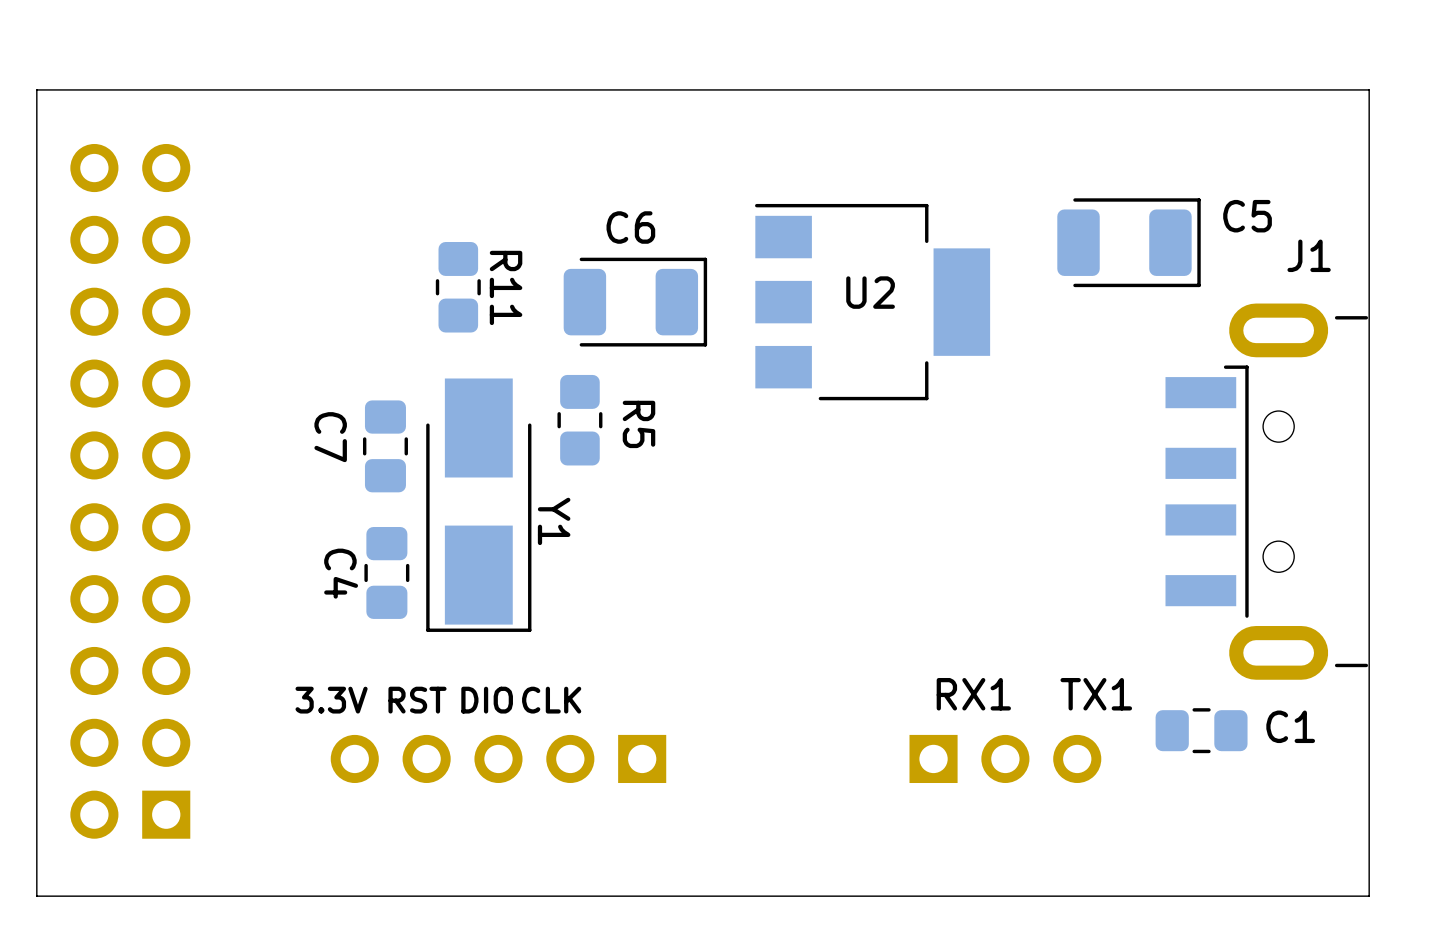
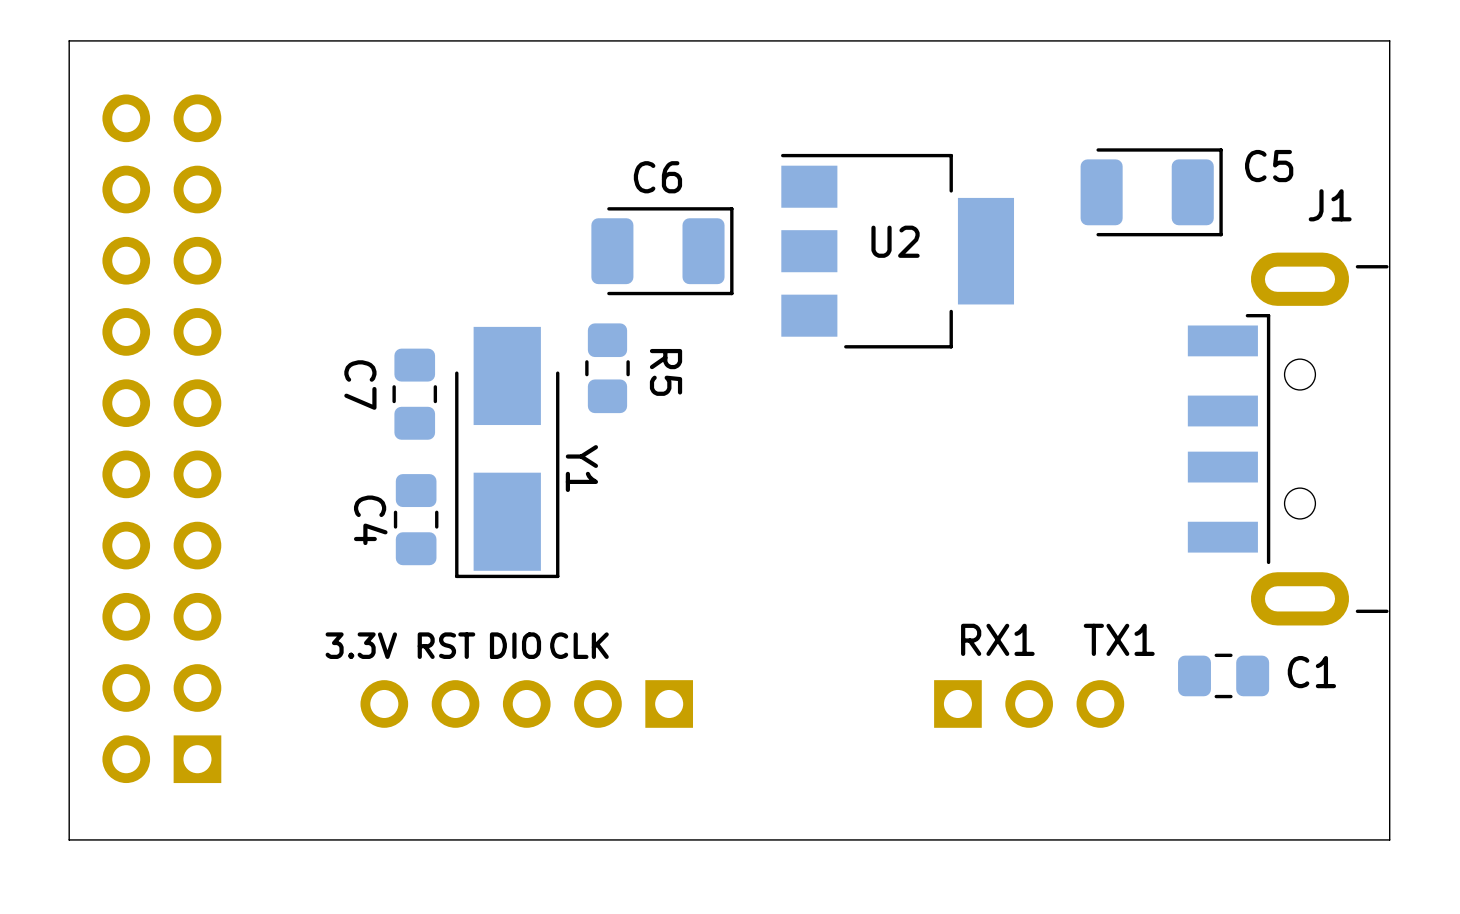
R11: (458, 287) -> none

